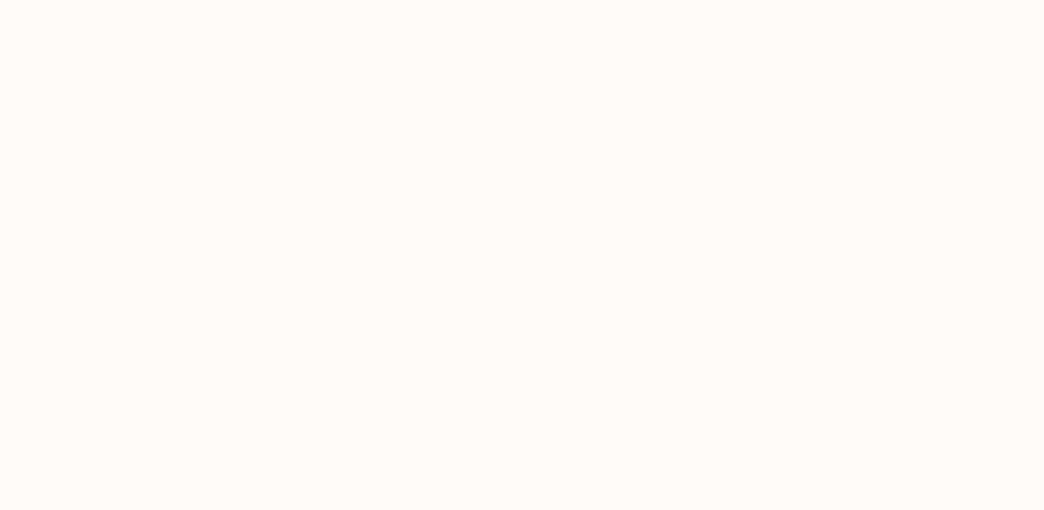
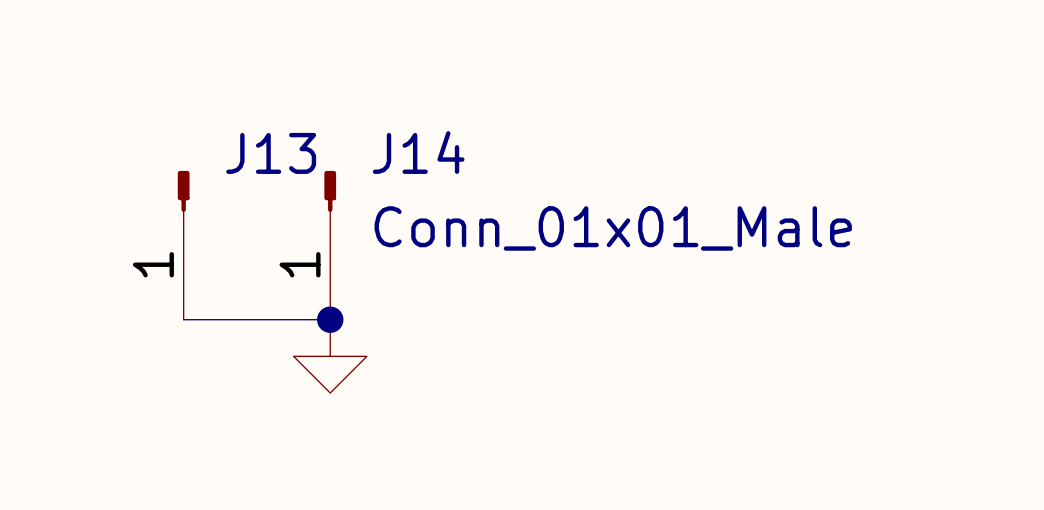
J13: none -> (183, 245)
J14: none -> Conn_01x01_Male (330, 245)
wire: none -> (183, 319) (330, 319)
junction: none -> (330, 319)
power symbol: none -> (330, 356)

